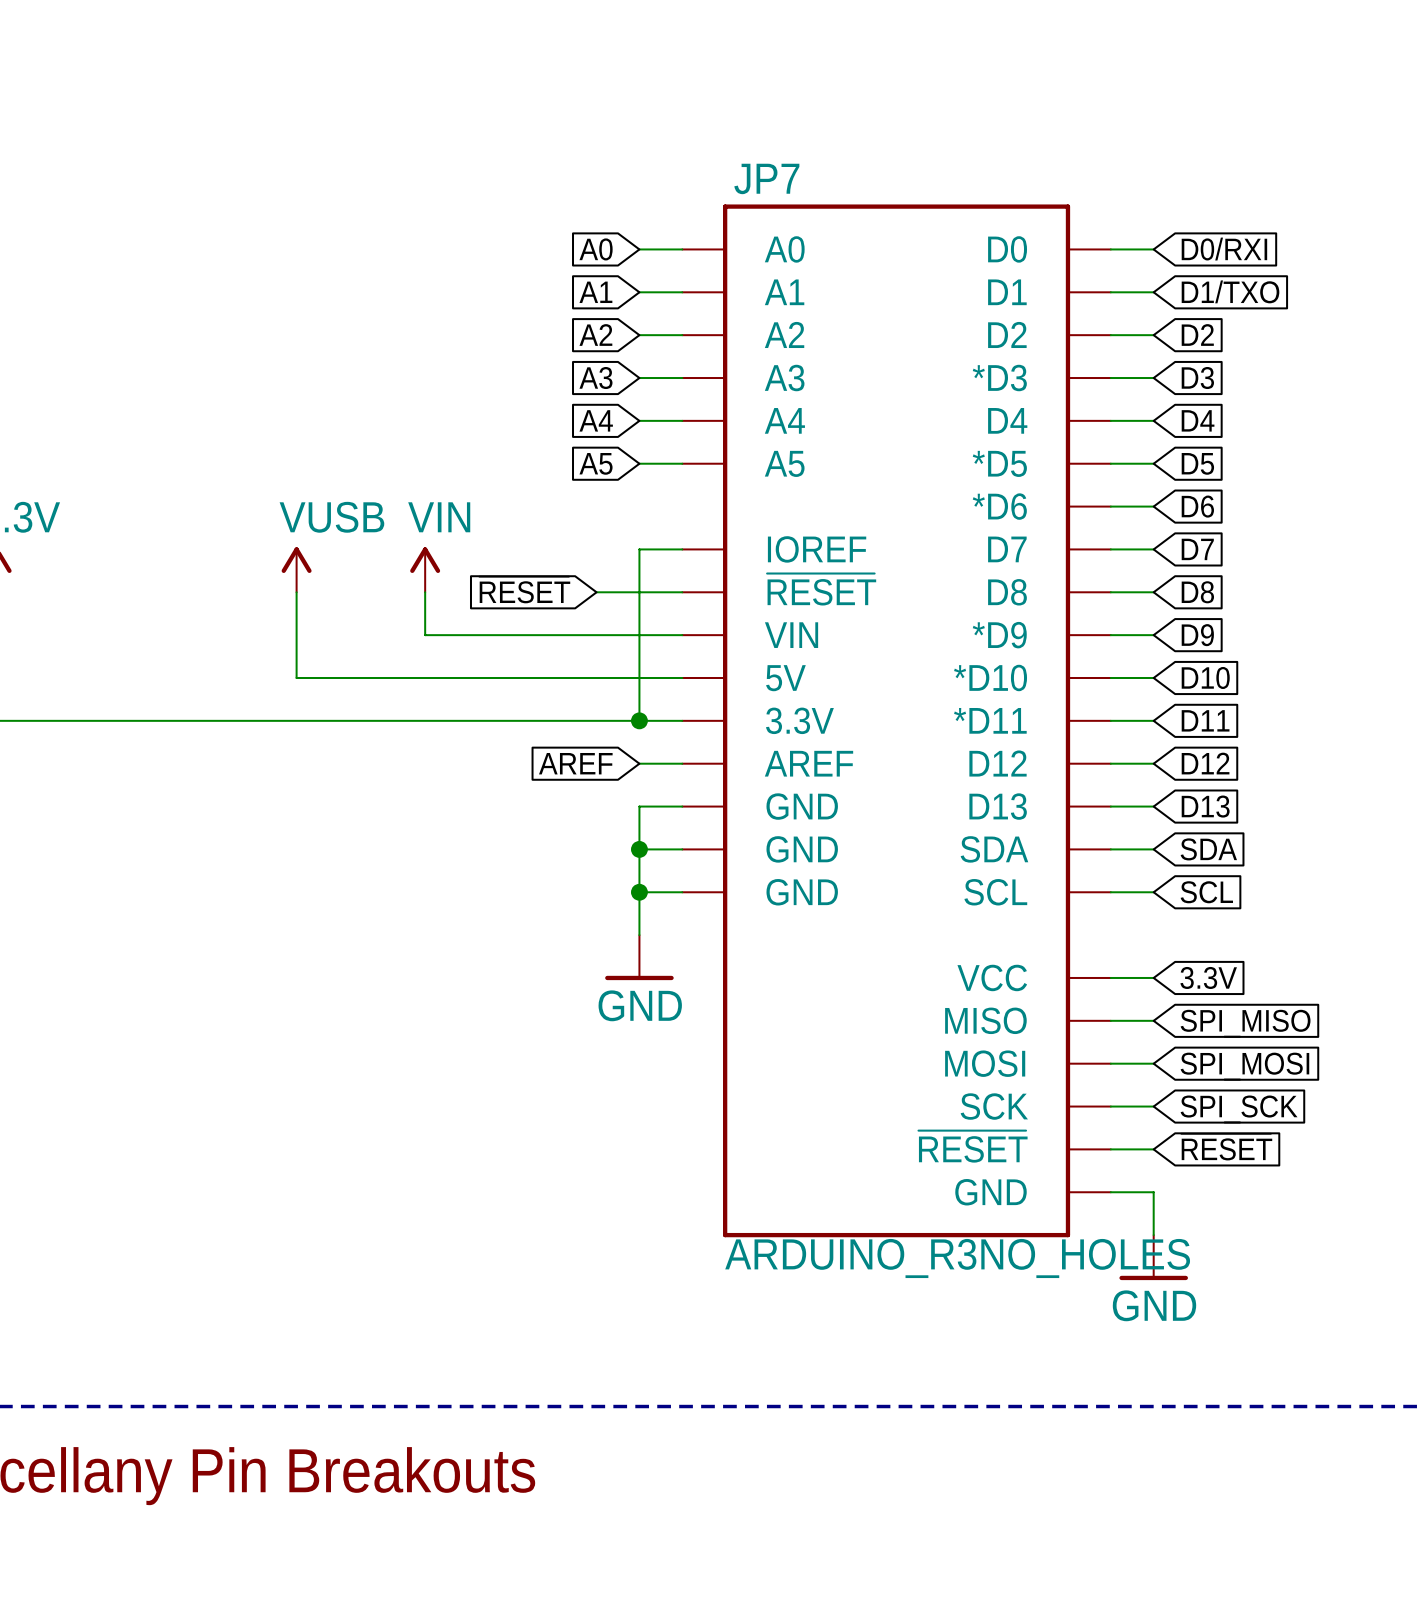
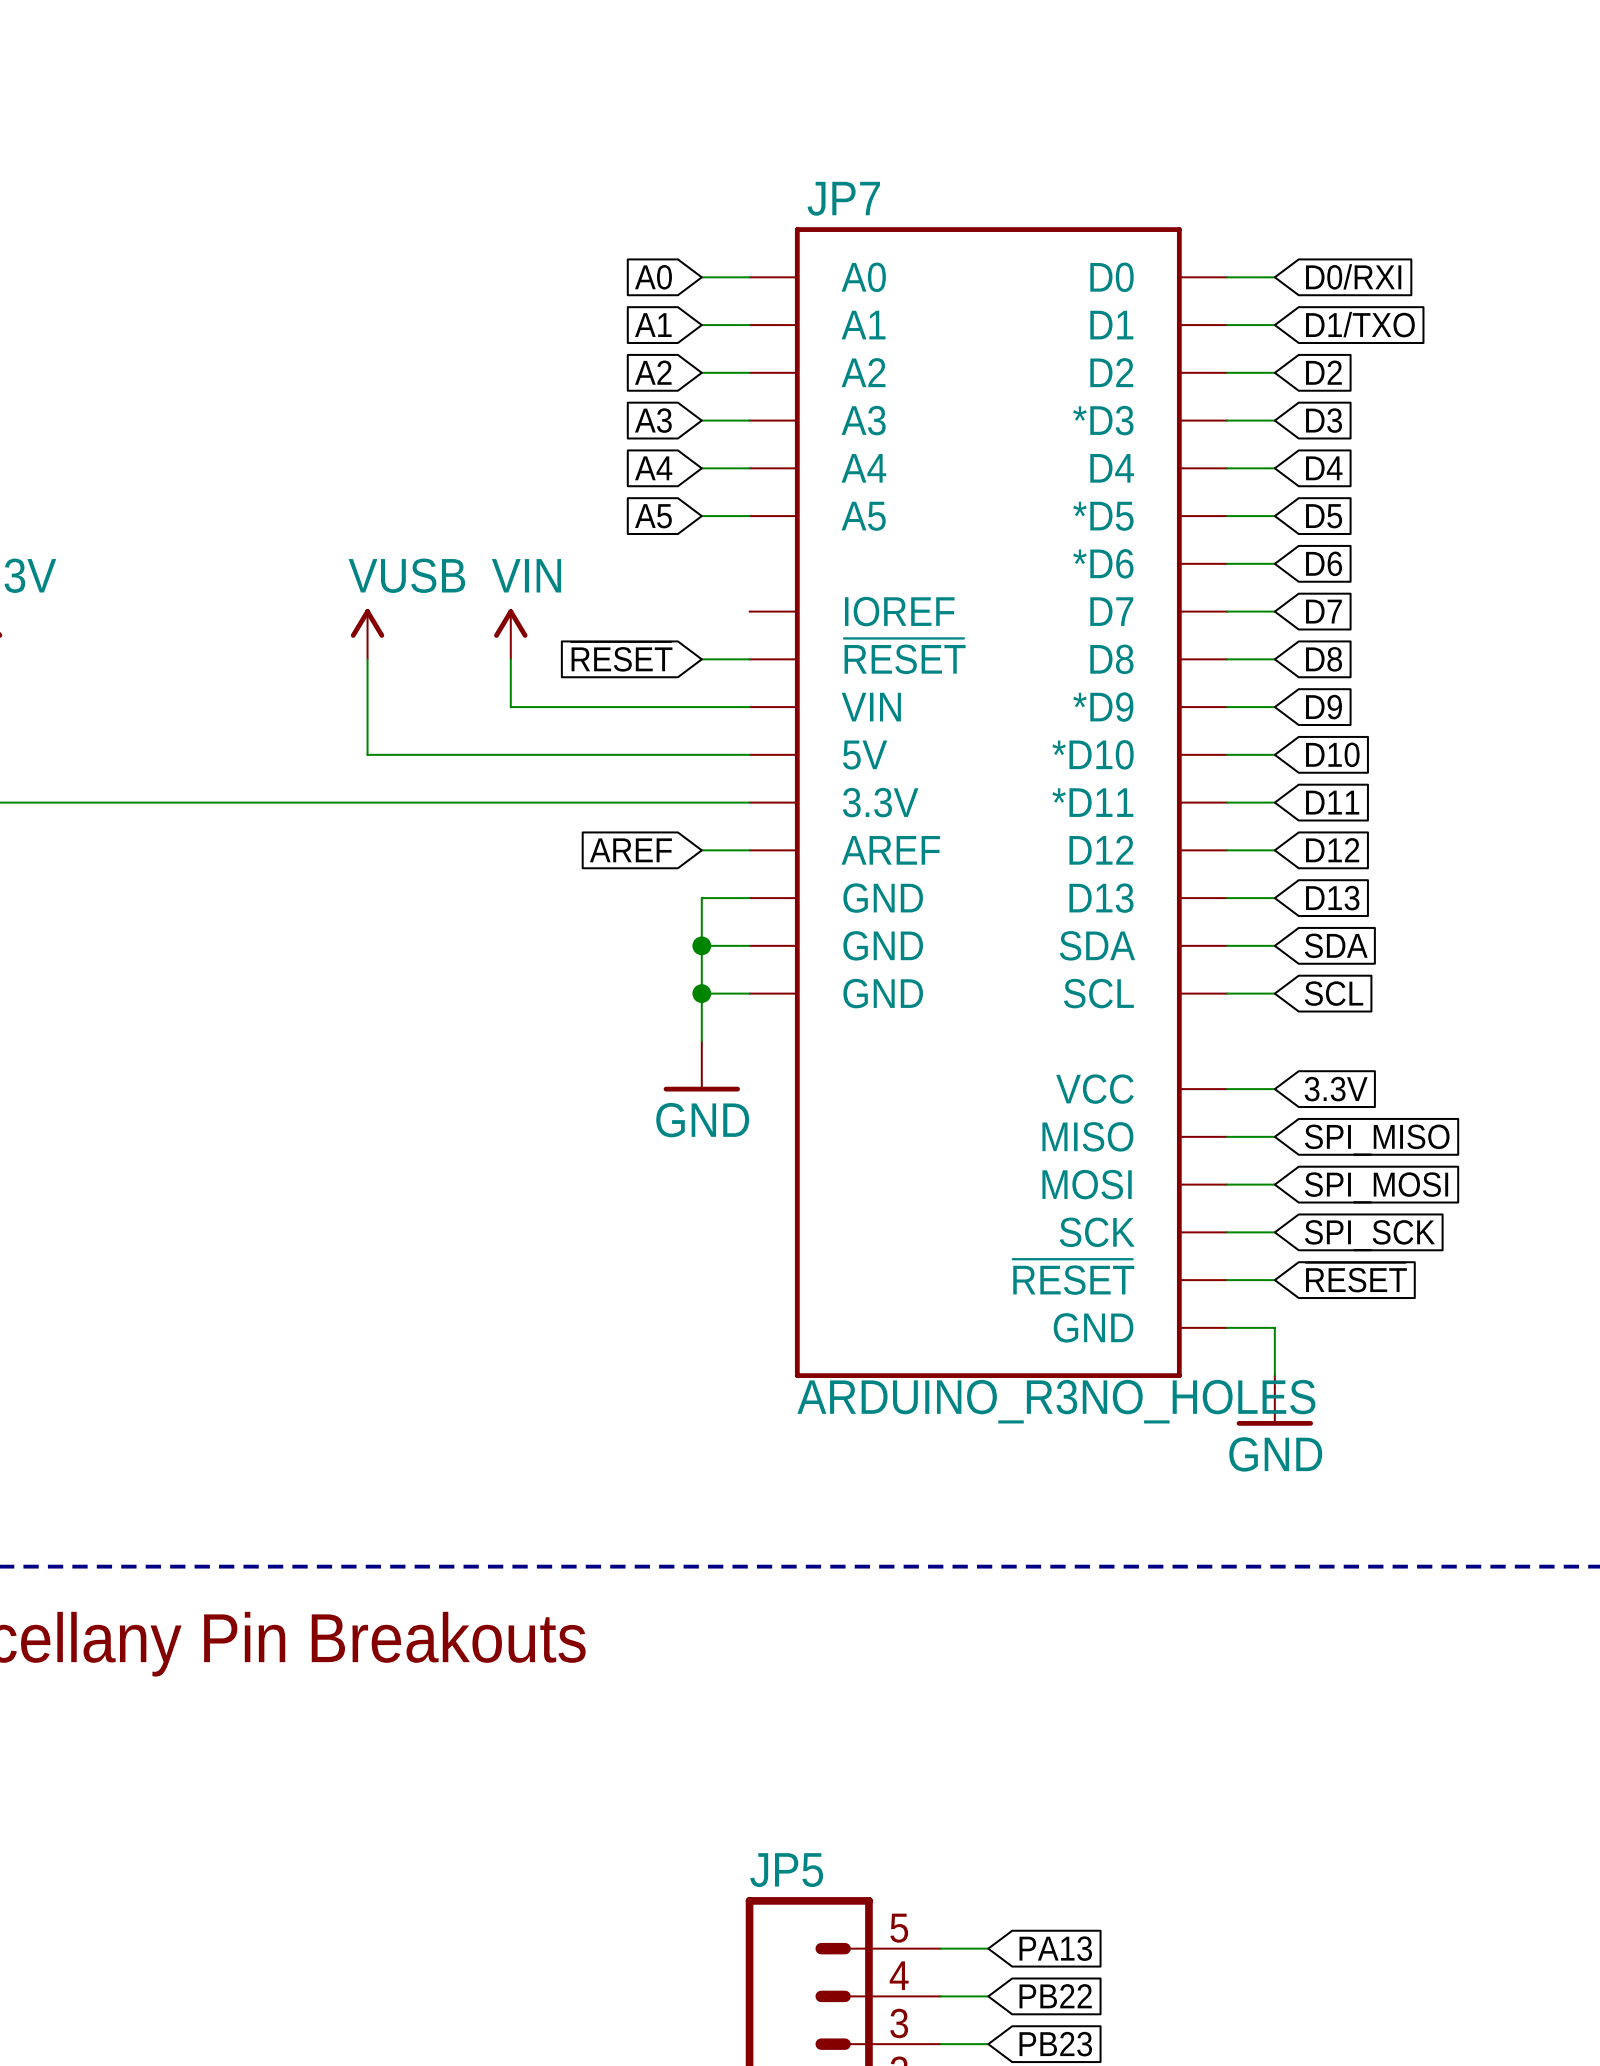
wire: (682, 549) (639, 549) (639, 720) -> none
power symbol position: VUSB (296, 569) -> VUSB (367, 634)
power symbol position: VIN (425, 569) -> VIN (510, 634)
global label position: ~{RESET} (524, 589) -> ~{RESET} (621, 656)
wire: (296, 592) (296, 677) (339, 677) -> (367, 659) (367, 754)
wire: (425, 592) (425, 635) (468, 635) -> (510, 659) (510, 707)
wire: (596, 592) (639, 592) -> none
junction: (639, 720) -> none

